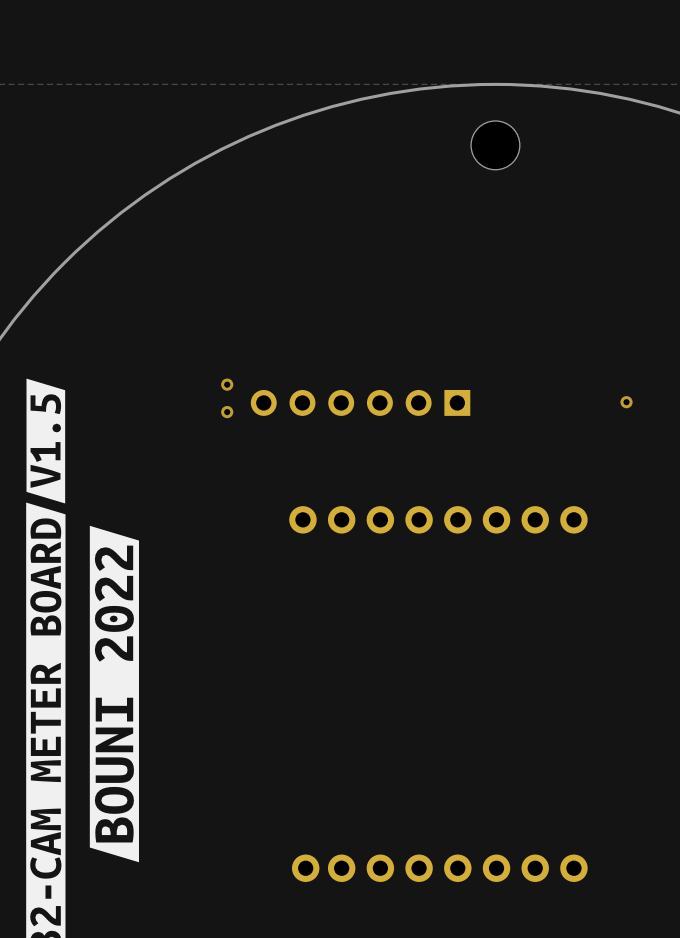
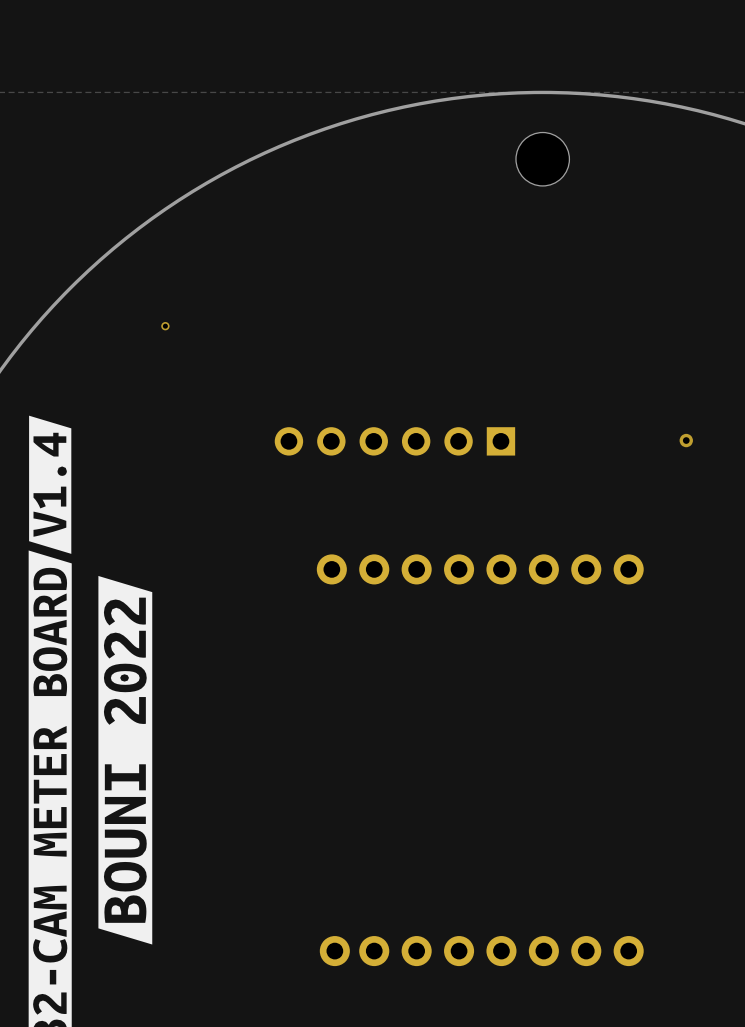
via: none -> (165, 326)
drawing shape: [26, 378, 66, 504] -> [29, 415, 72, 554]
via: (227, 384) -> none
via: (227, 412) -> none

